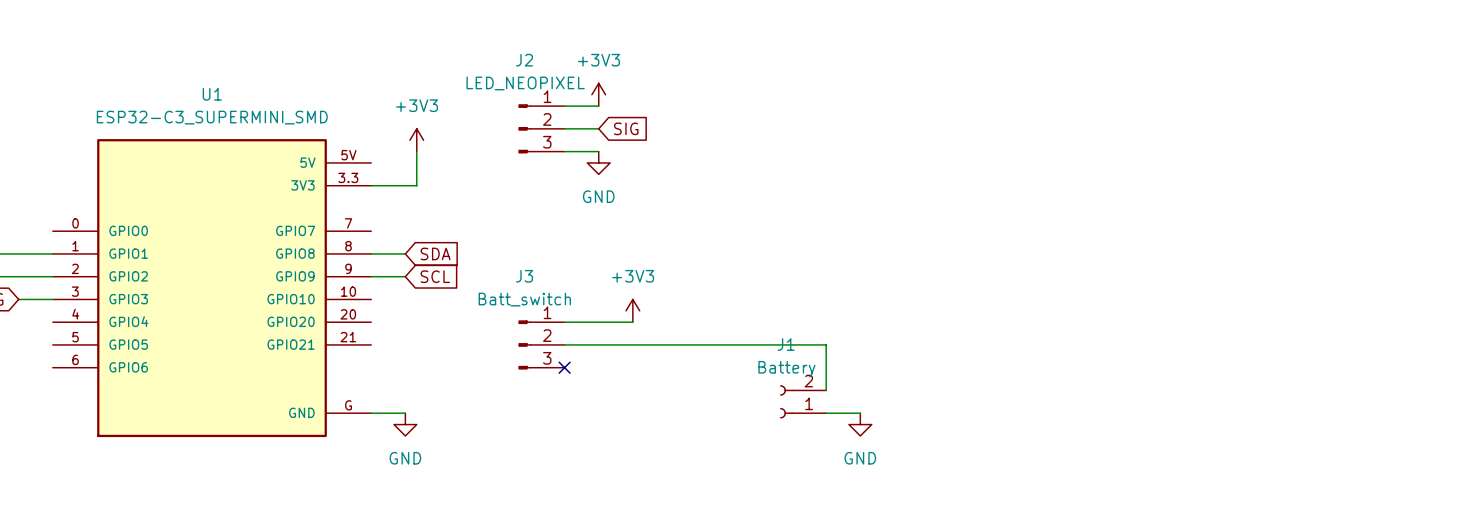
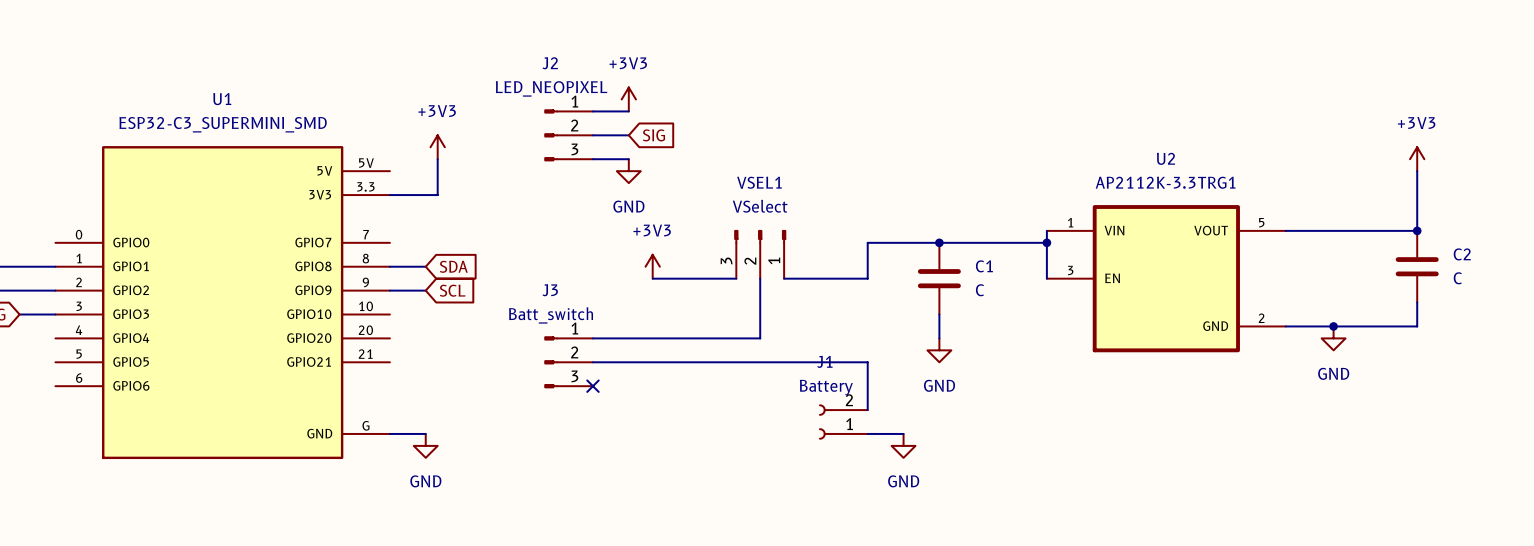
power symbol: none -> +3V3 (1417, 159)
wire: none -> (1417, 171) (1417, 230) (1285, 230)
wire: none -> (1046, 230) (1046, 278)
junction: none -> (1417, 230)
junction: none -> (939, 242)
wire: none -> (1046, 242) (867, 242) (867, 278) (784, 278)
junction: none -> (1046, 242)
VSEL1: none -> VSelect (760, 254)
C2: none -> C (1417, 266)
wire: none -> (652, 278) (736, 278)
wire: none -> (760, 278) (760, 338) (664, 338)
C1: none -> C (939, 278)
U2: none -> AP2112K-3.3TRG1 (1166, 278)
wire: none -> (1417, 302) (1417, 326) (1285, 326)
wire: none -> (939, 314) (939, 338)
power symbol position: +3V3 (632, 310) -> +3V3 (652, 266)
junction: none -> (1333, 326)
power symbol: none -> GND (1333, 338)
power symbol: none -> GND (939, 350)

